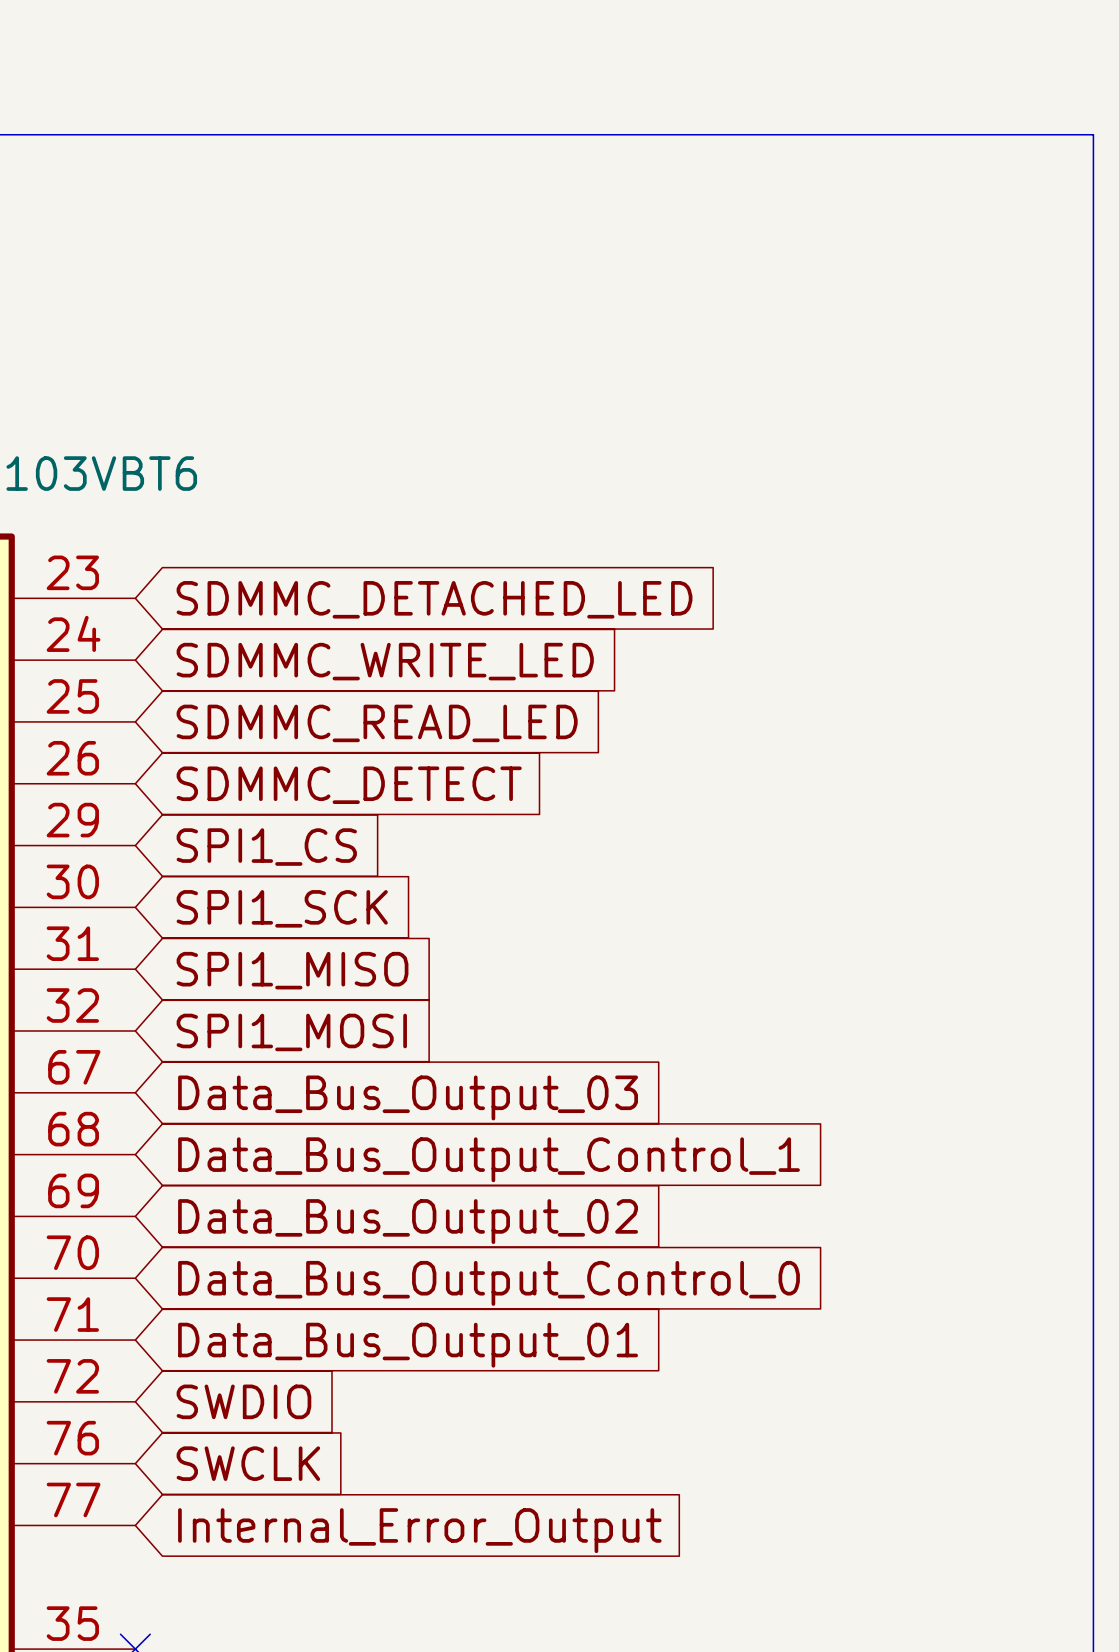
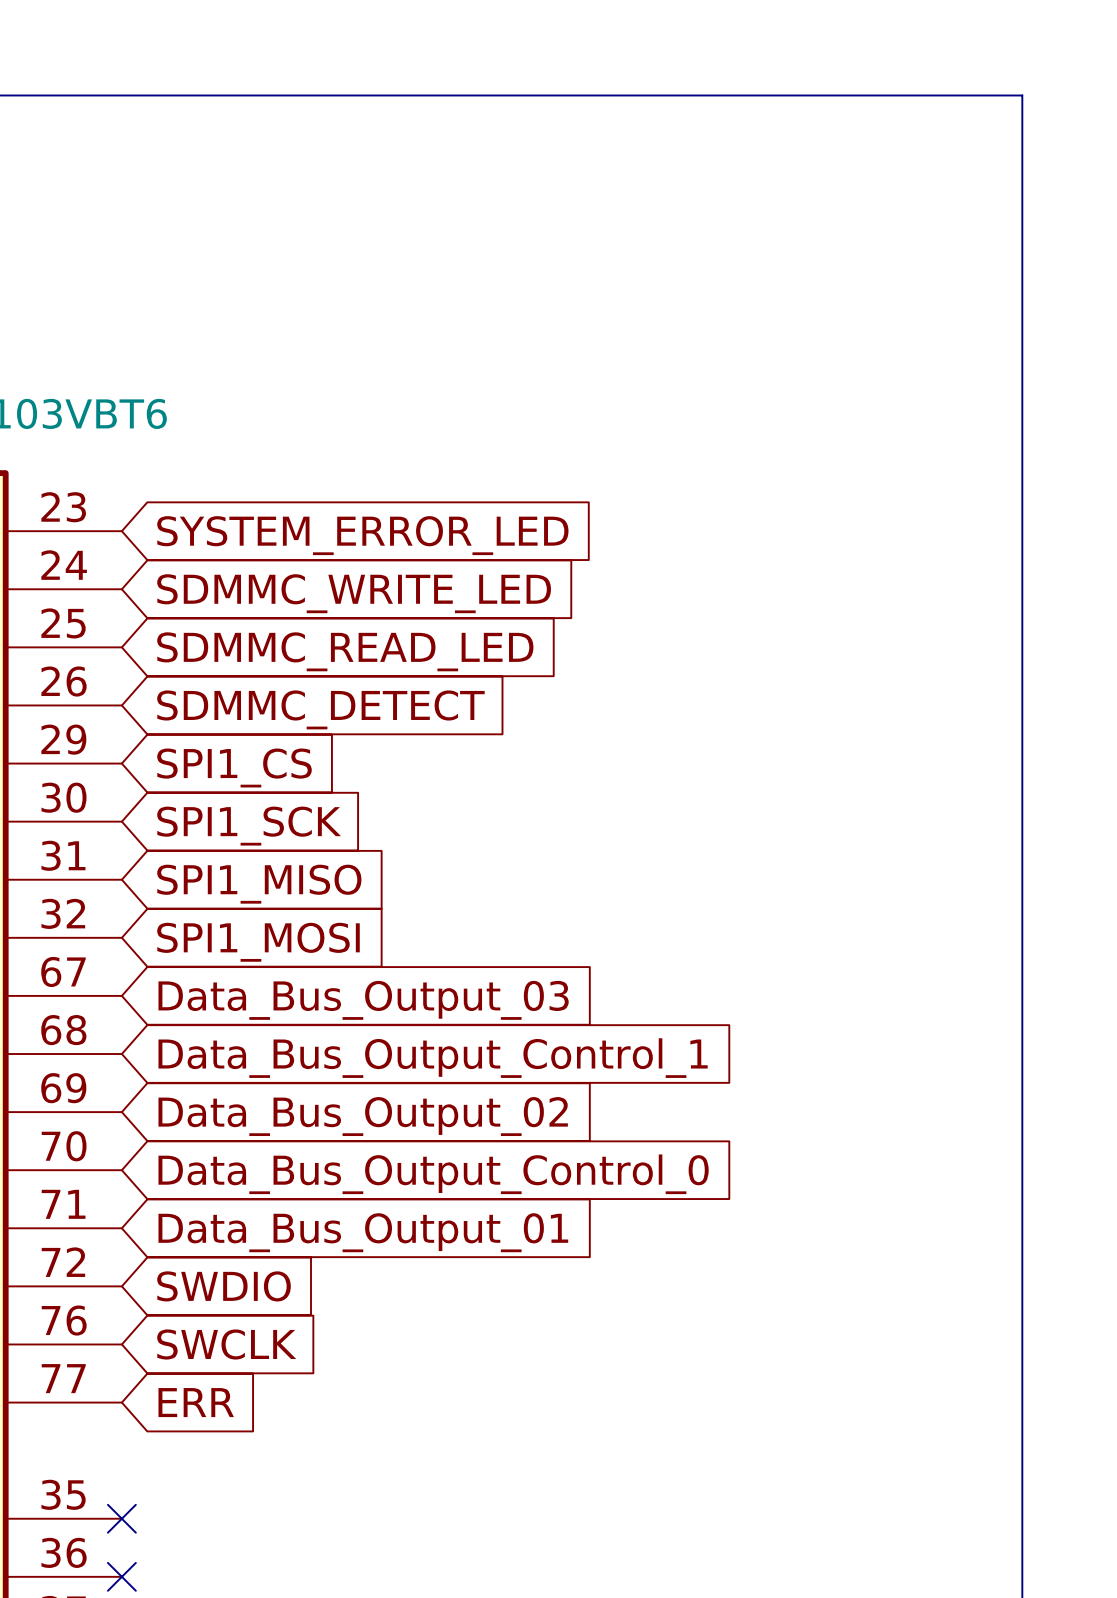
global label: SDMMC_DETACHED_LED (434, 599) -> SYSTEM_ERROR_LED (362, 535)
global label: Internal_Error_Output (419, 1530) -> ERR (196, 1402)

